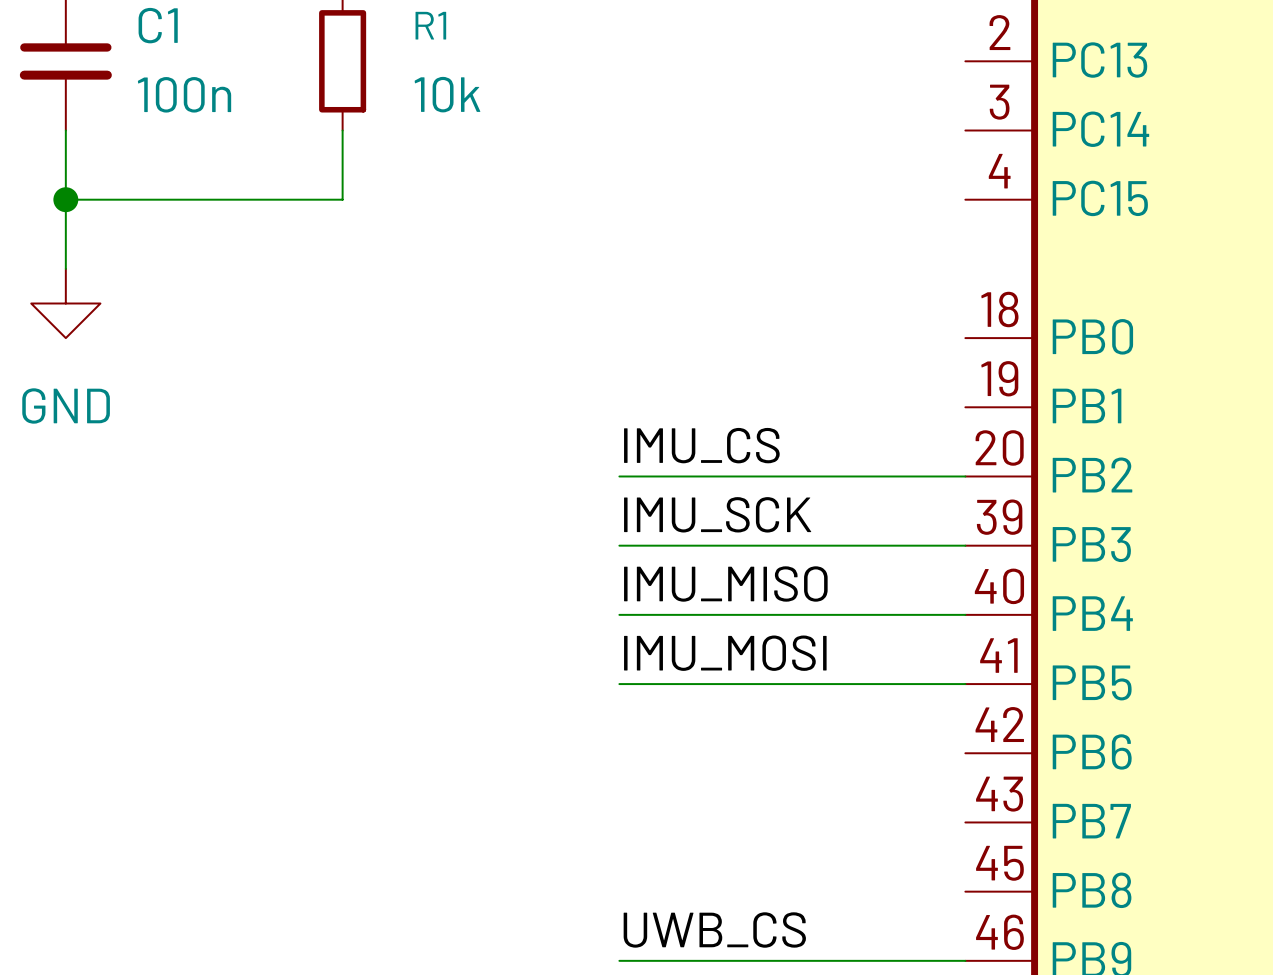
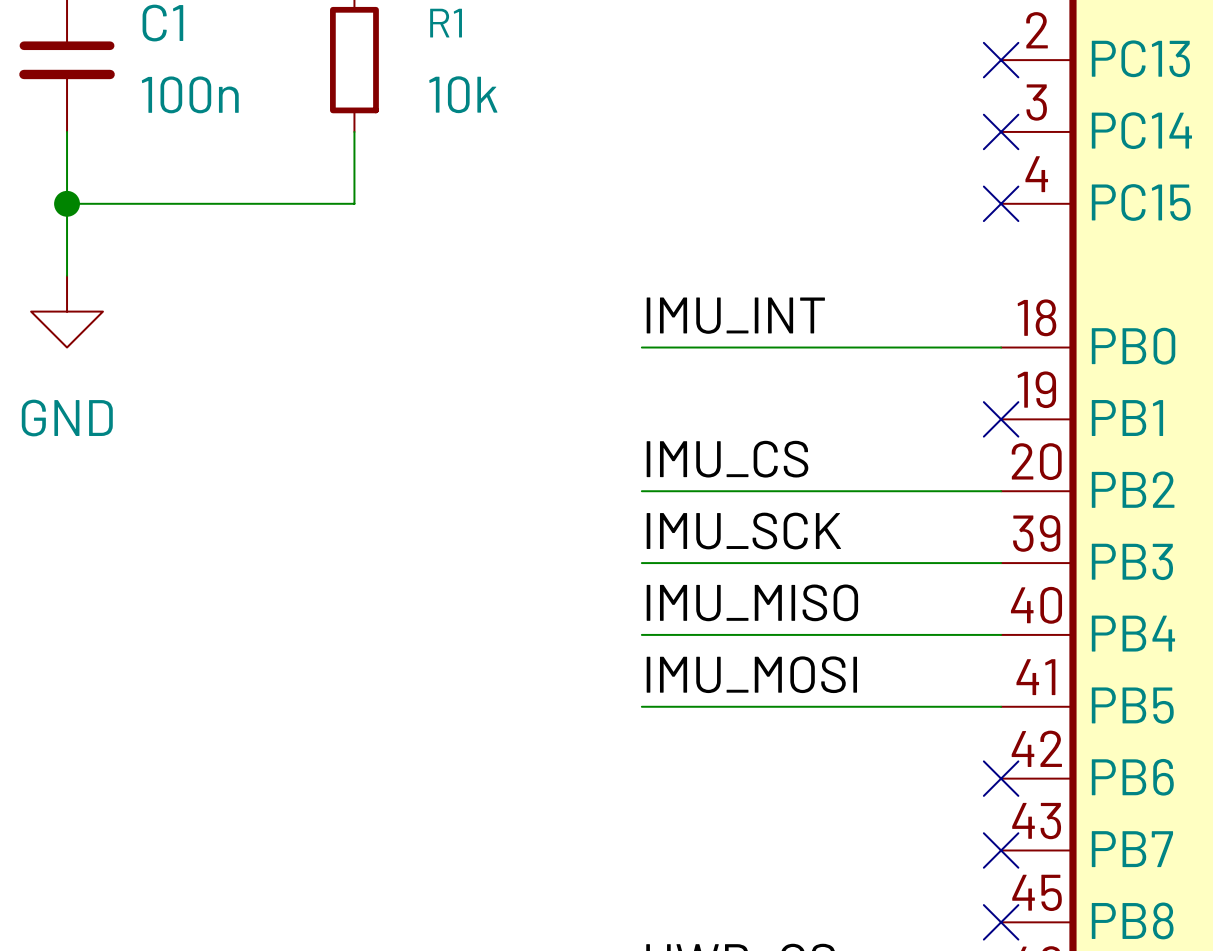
no-connect mark: none -> (1001, 60)
no-connect mark: none -> (1001, 131)
no-connect mark: none -> (1001, 203)
label: none -> IMU_INT (735, 315)
wire: none -> (641, 347) (1001, 347)
no-connect mark: none -> (1001, 419)
no-connect mark: none -> (1001, 778)
no-connect mark: none -> (1001, 850)
no-connect mark: none -> (1001, 922)

